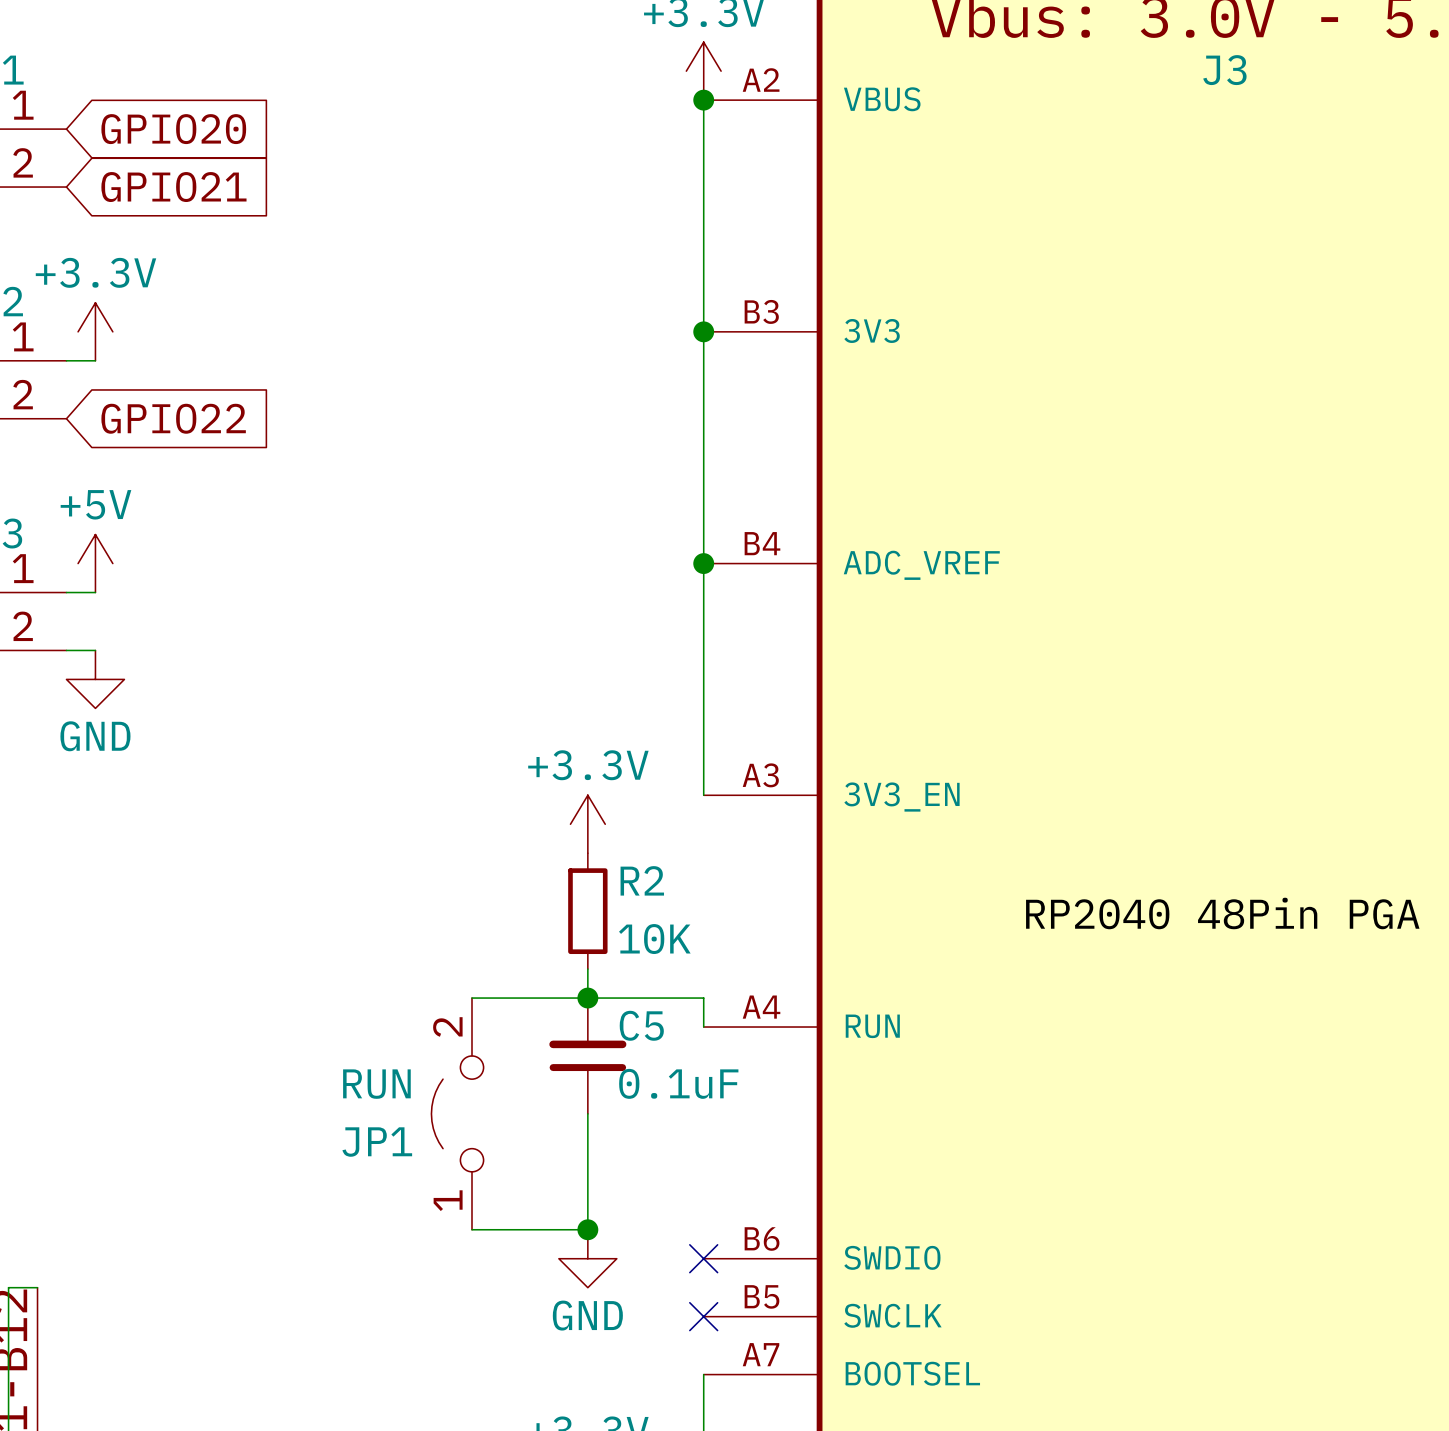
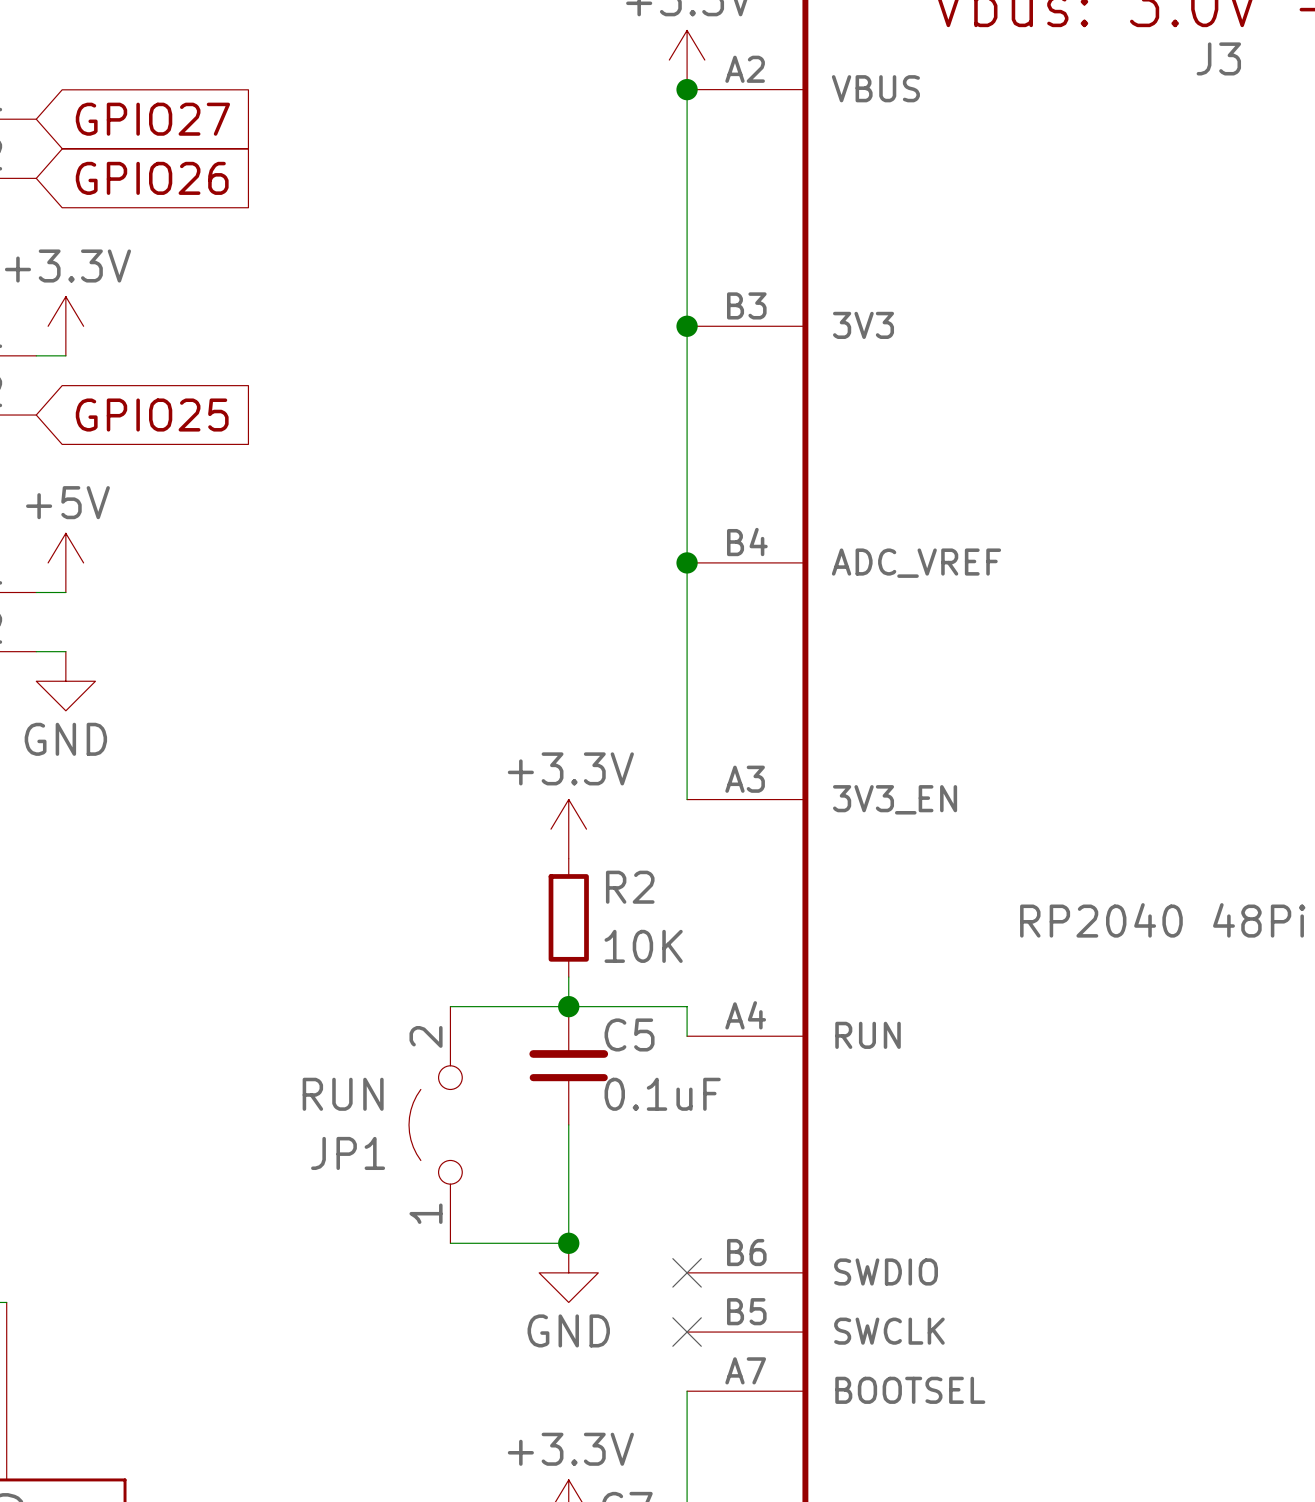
global label: GPIO20 (173, 129) -> GPIO27 (152, 119)
global label: GPIO21 (173, 187) -> GPIO26 (152, 178)
global label: GPIO22 (173, 418) -> GPIO25 (152, 415)

